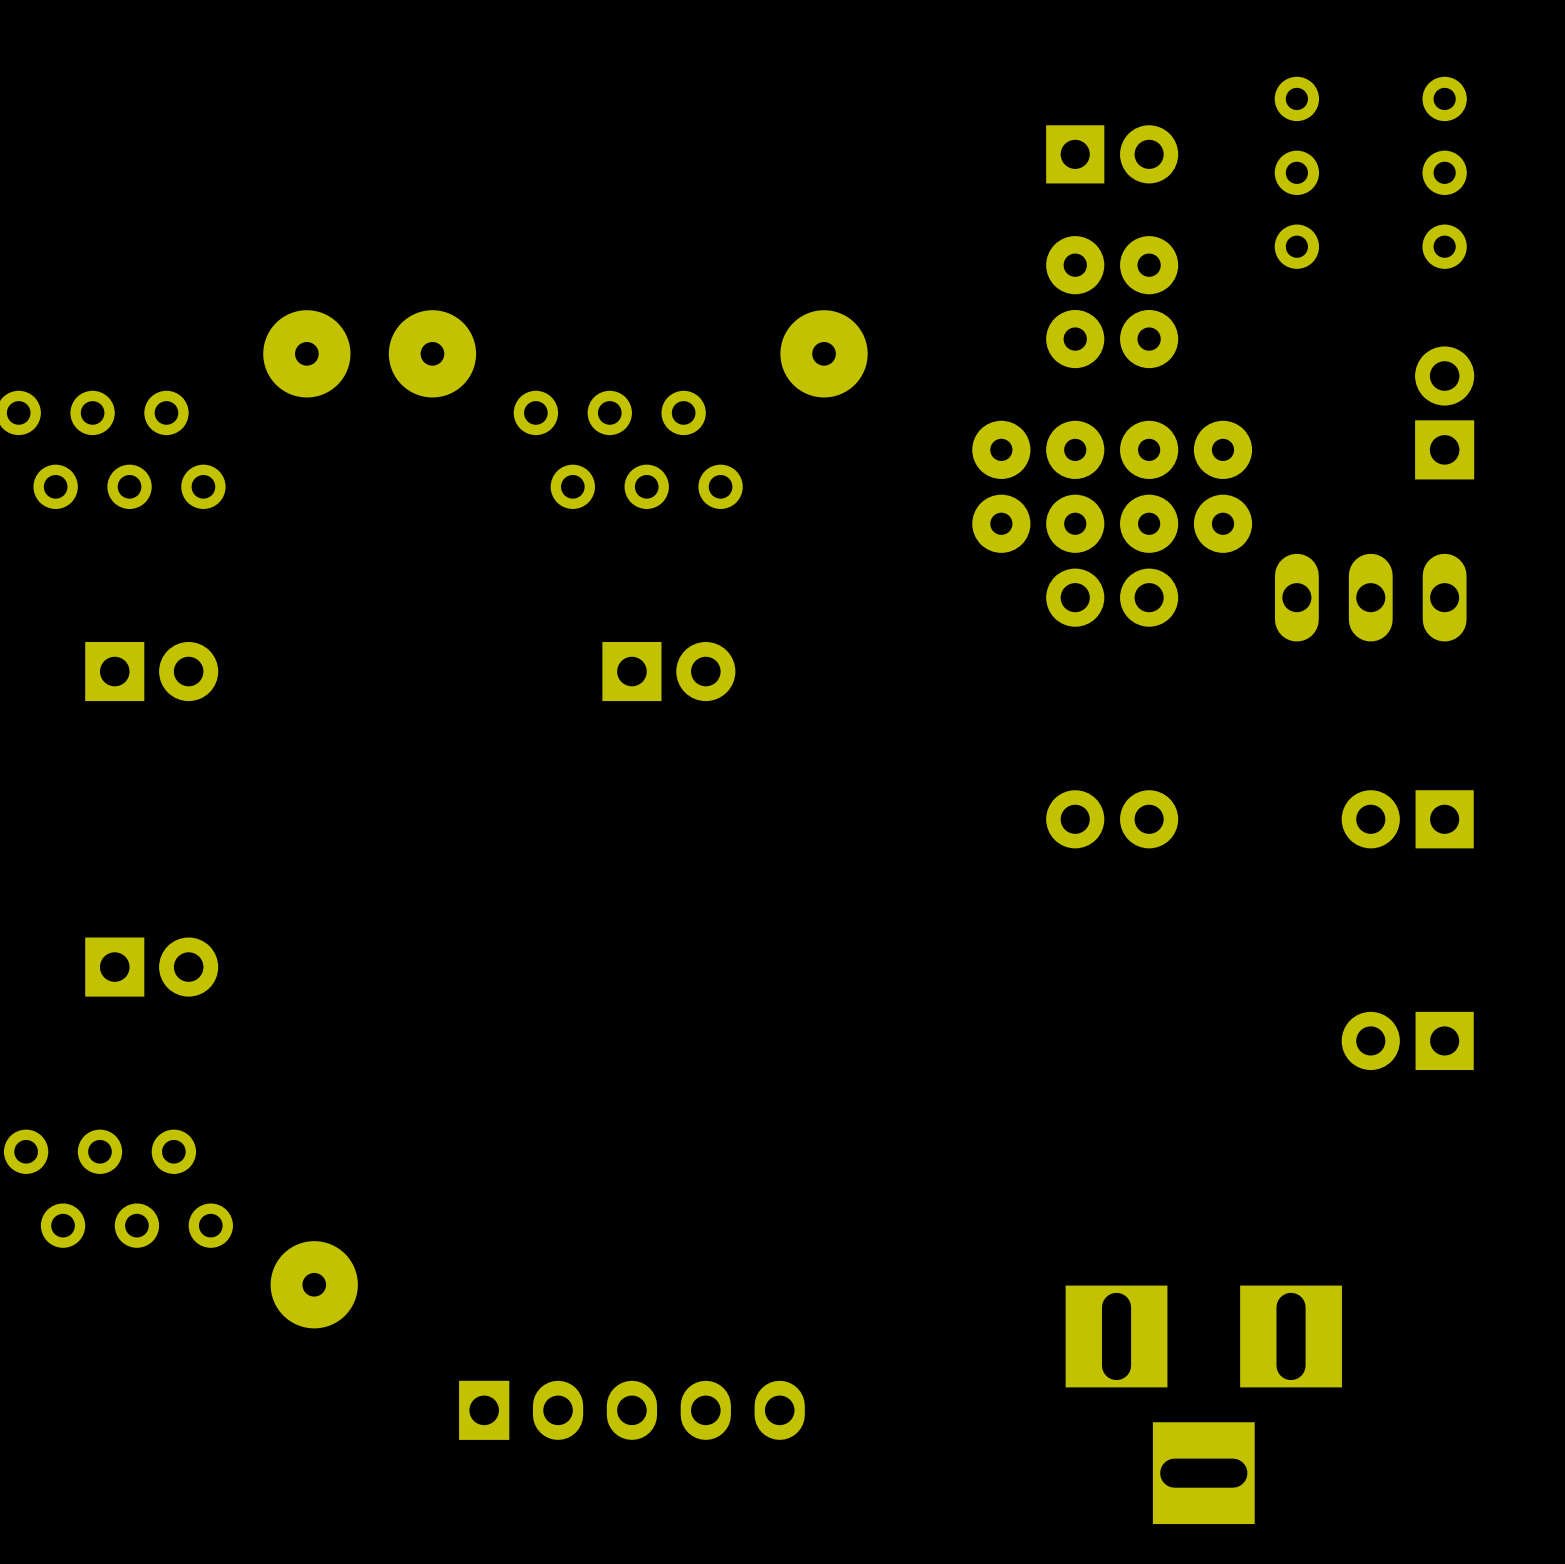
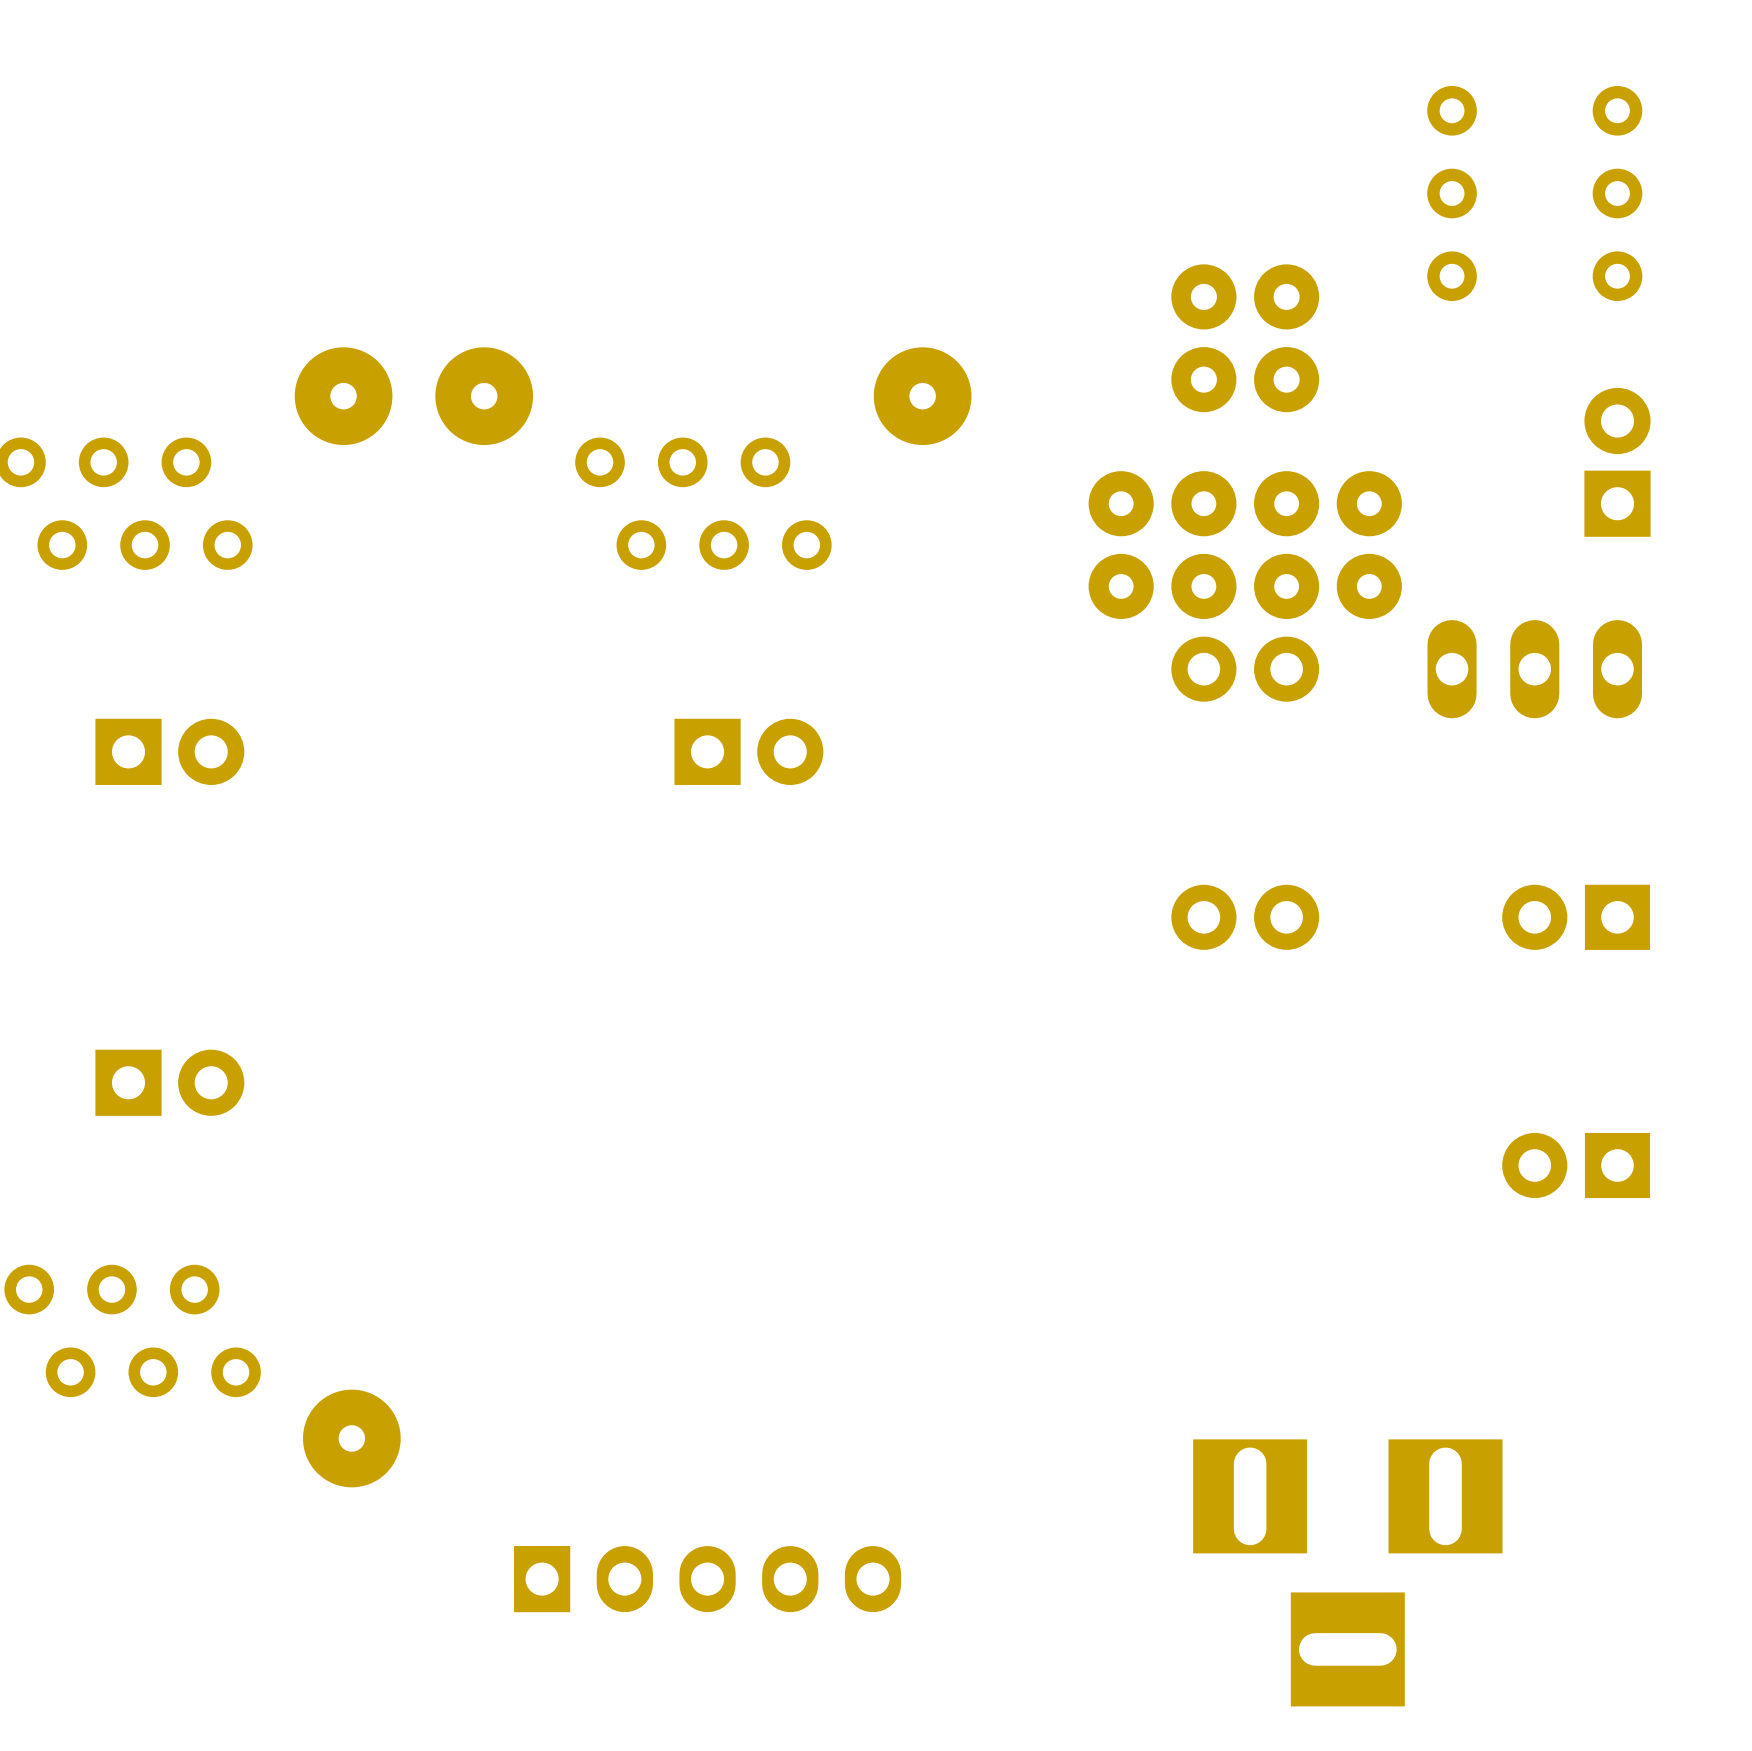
part: (1112, 154) -> none

